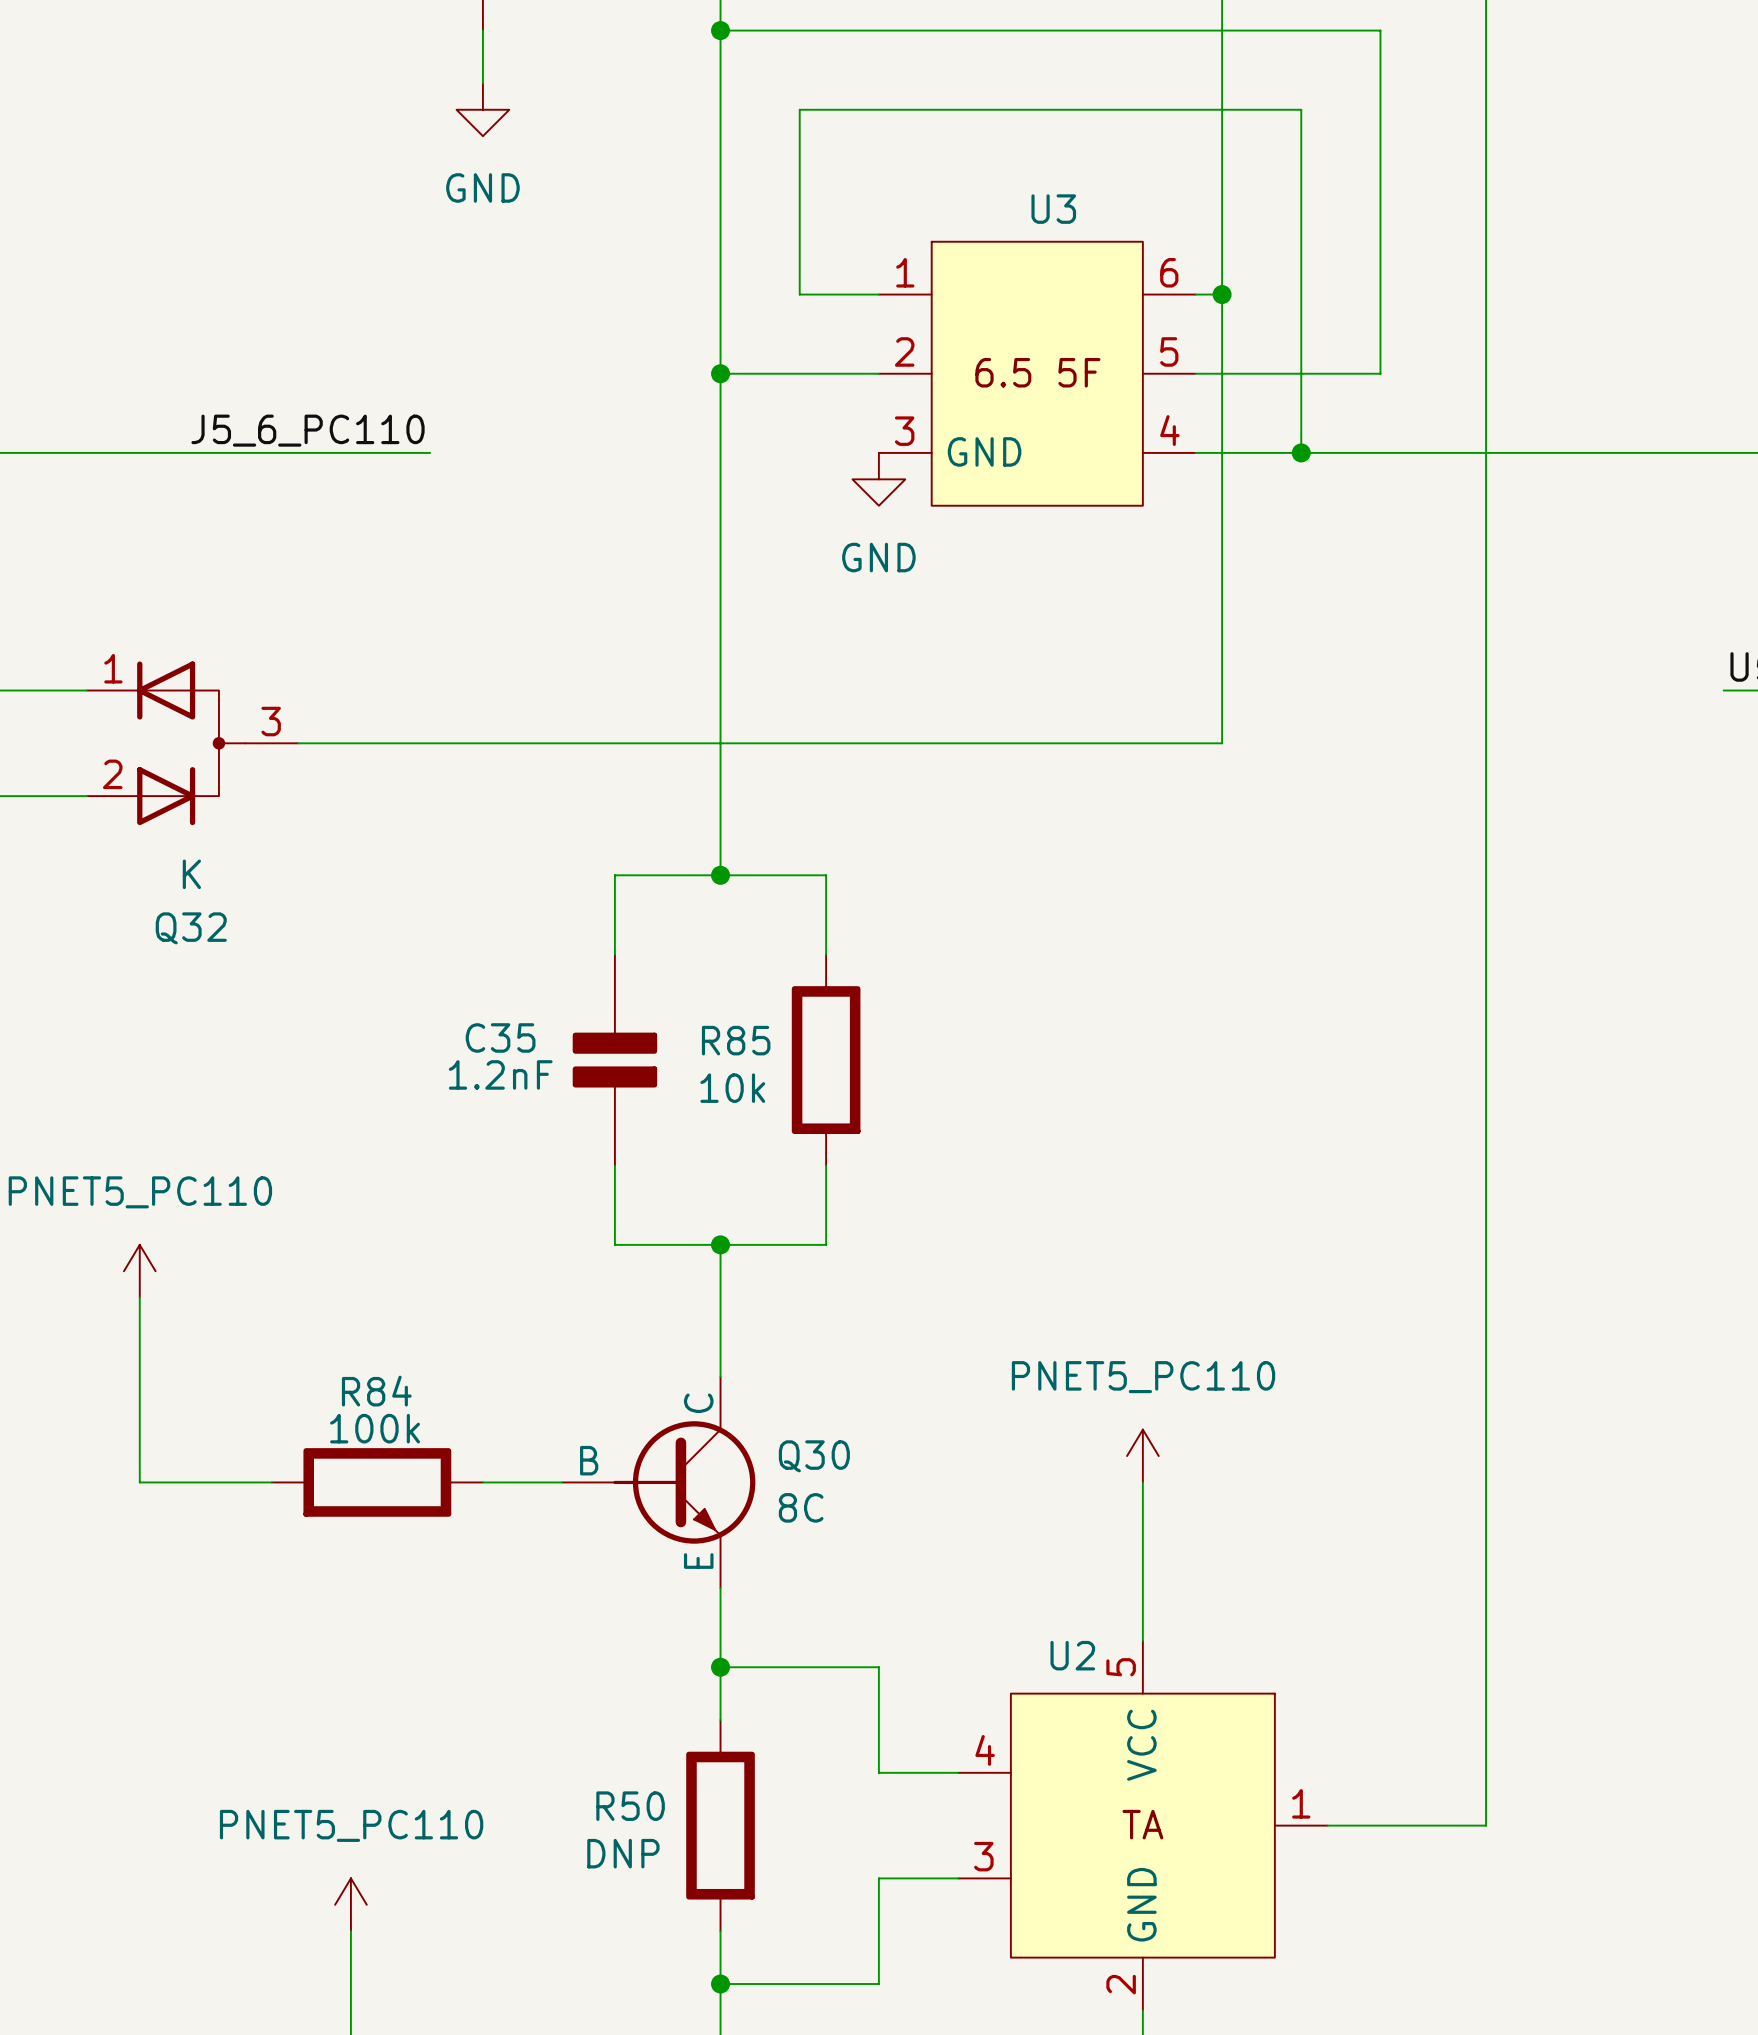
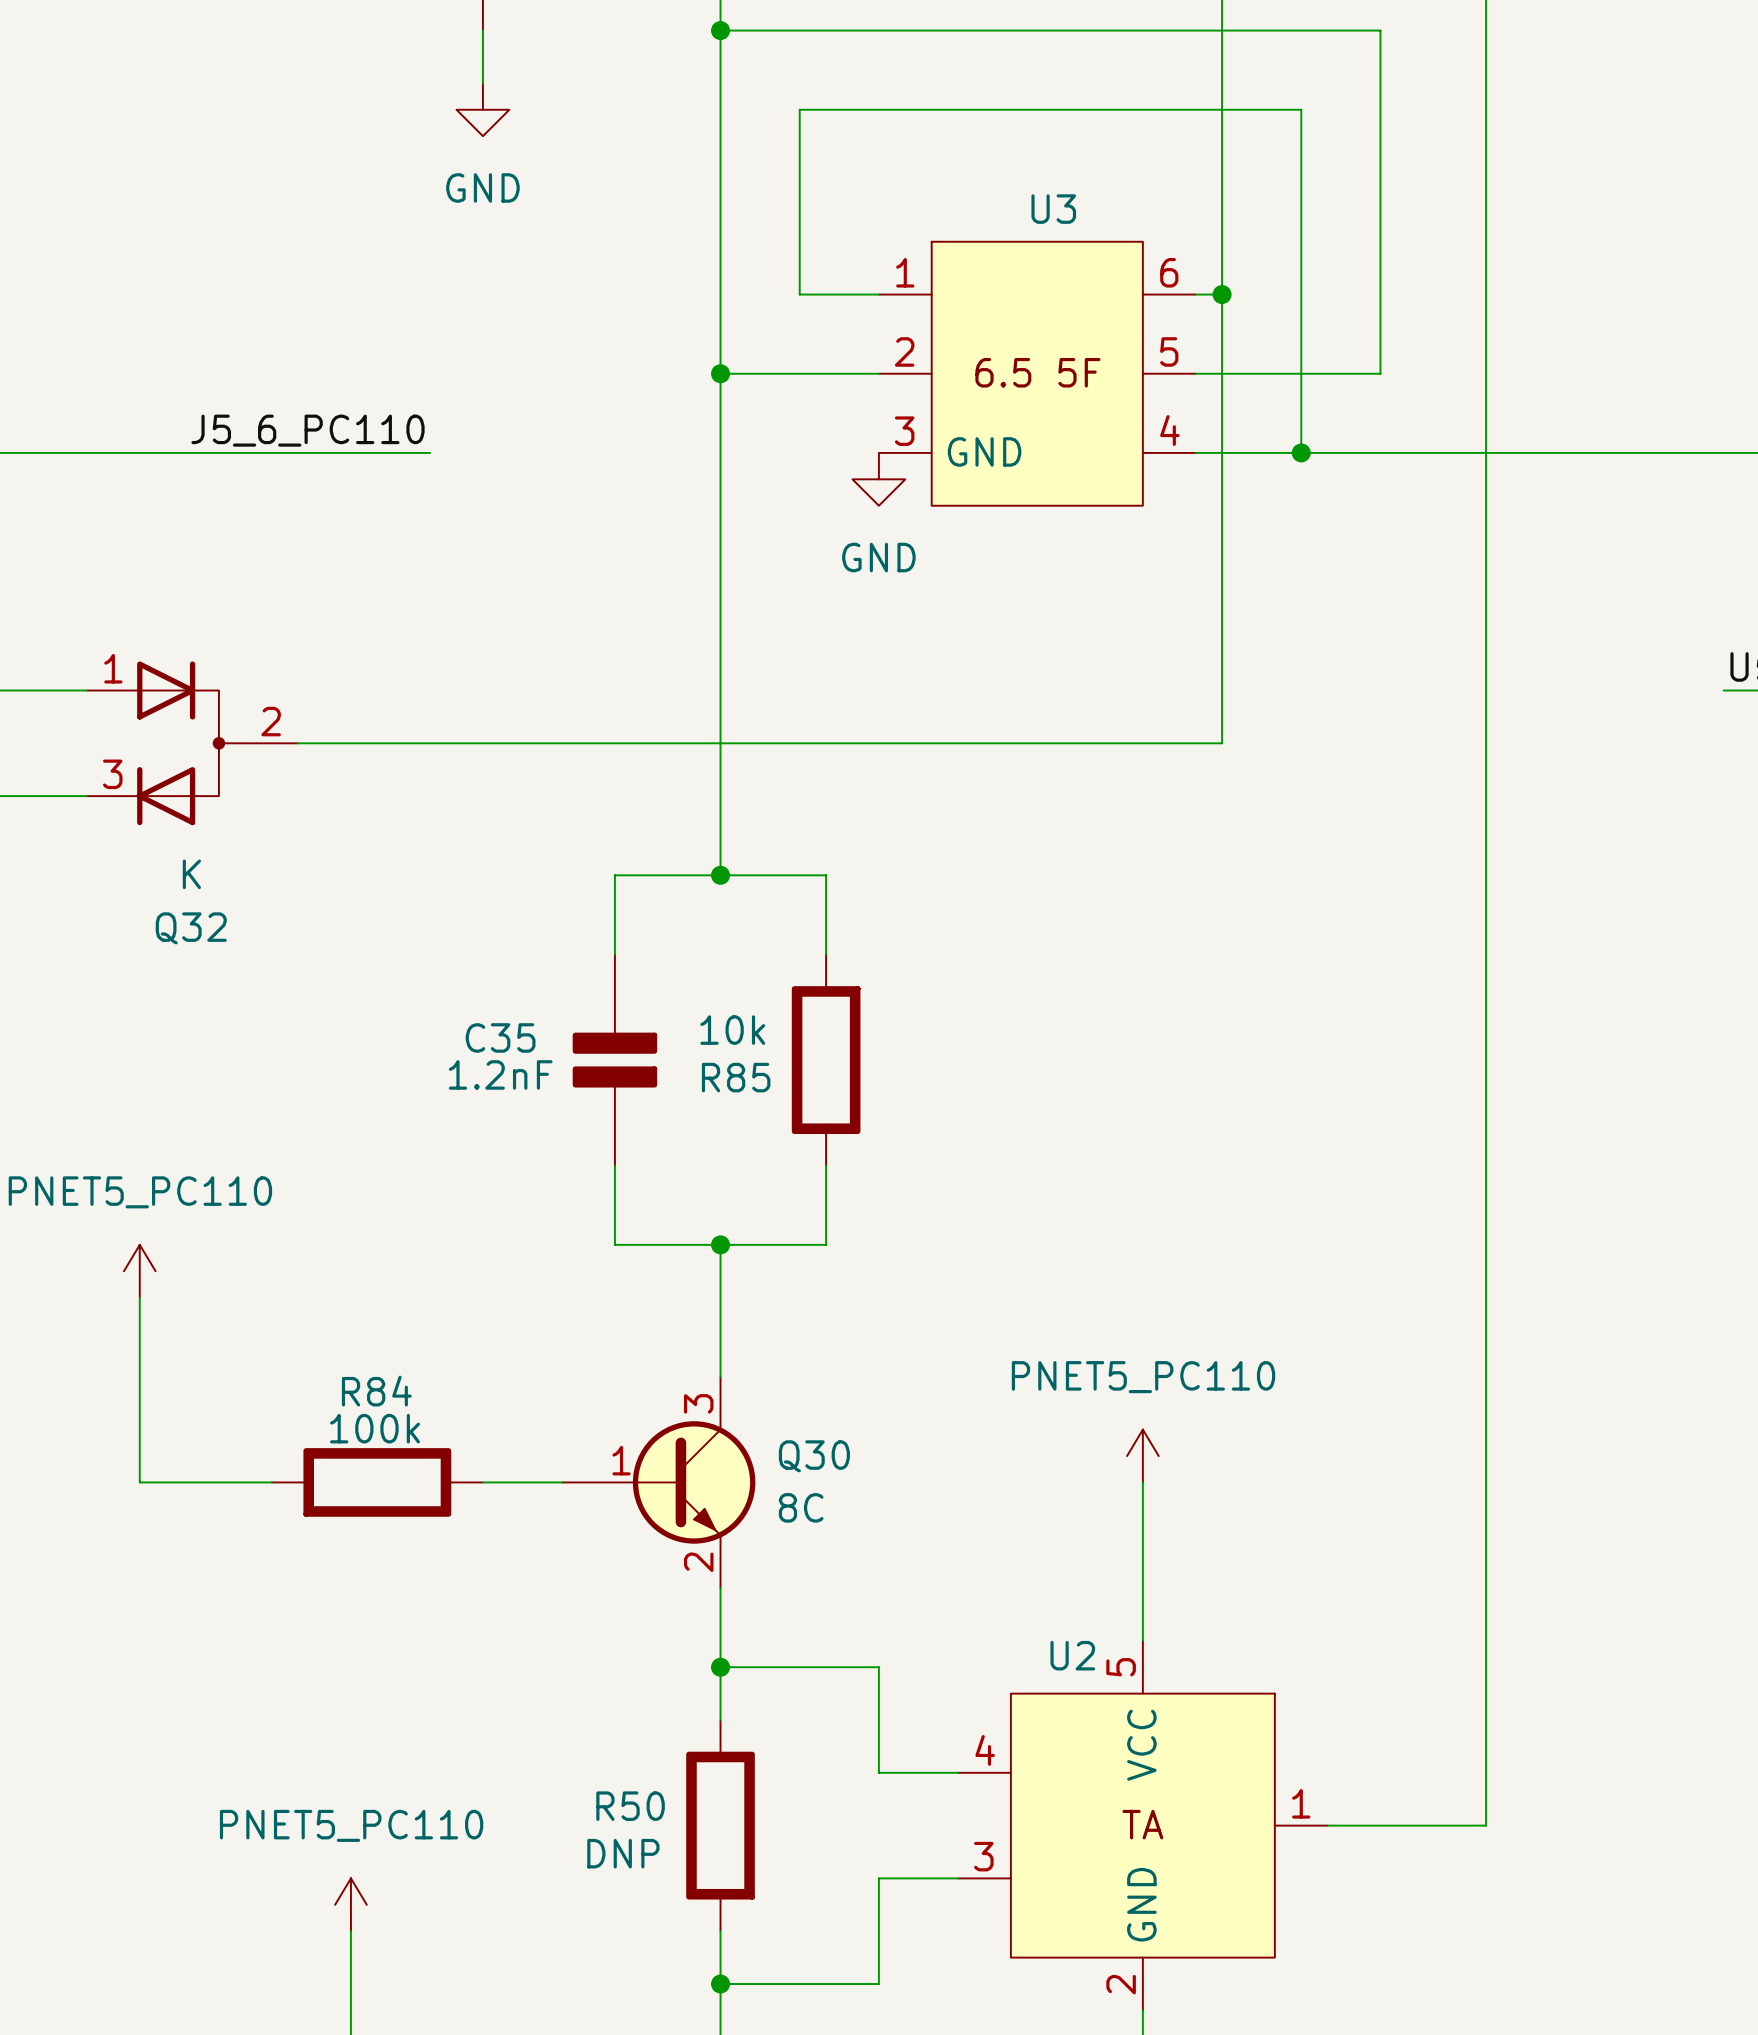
Q32 symbol: [86, 661, 299, 826] -> [86, 661, 299, 826]
R85 flip: as is (826, 1060) -> up-down (826, 1060)
Q30 symbol: [562, 1376, 756, 1589] -> [562, 1376, 756, 1589]

